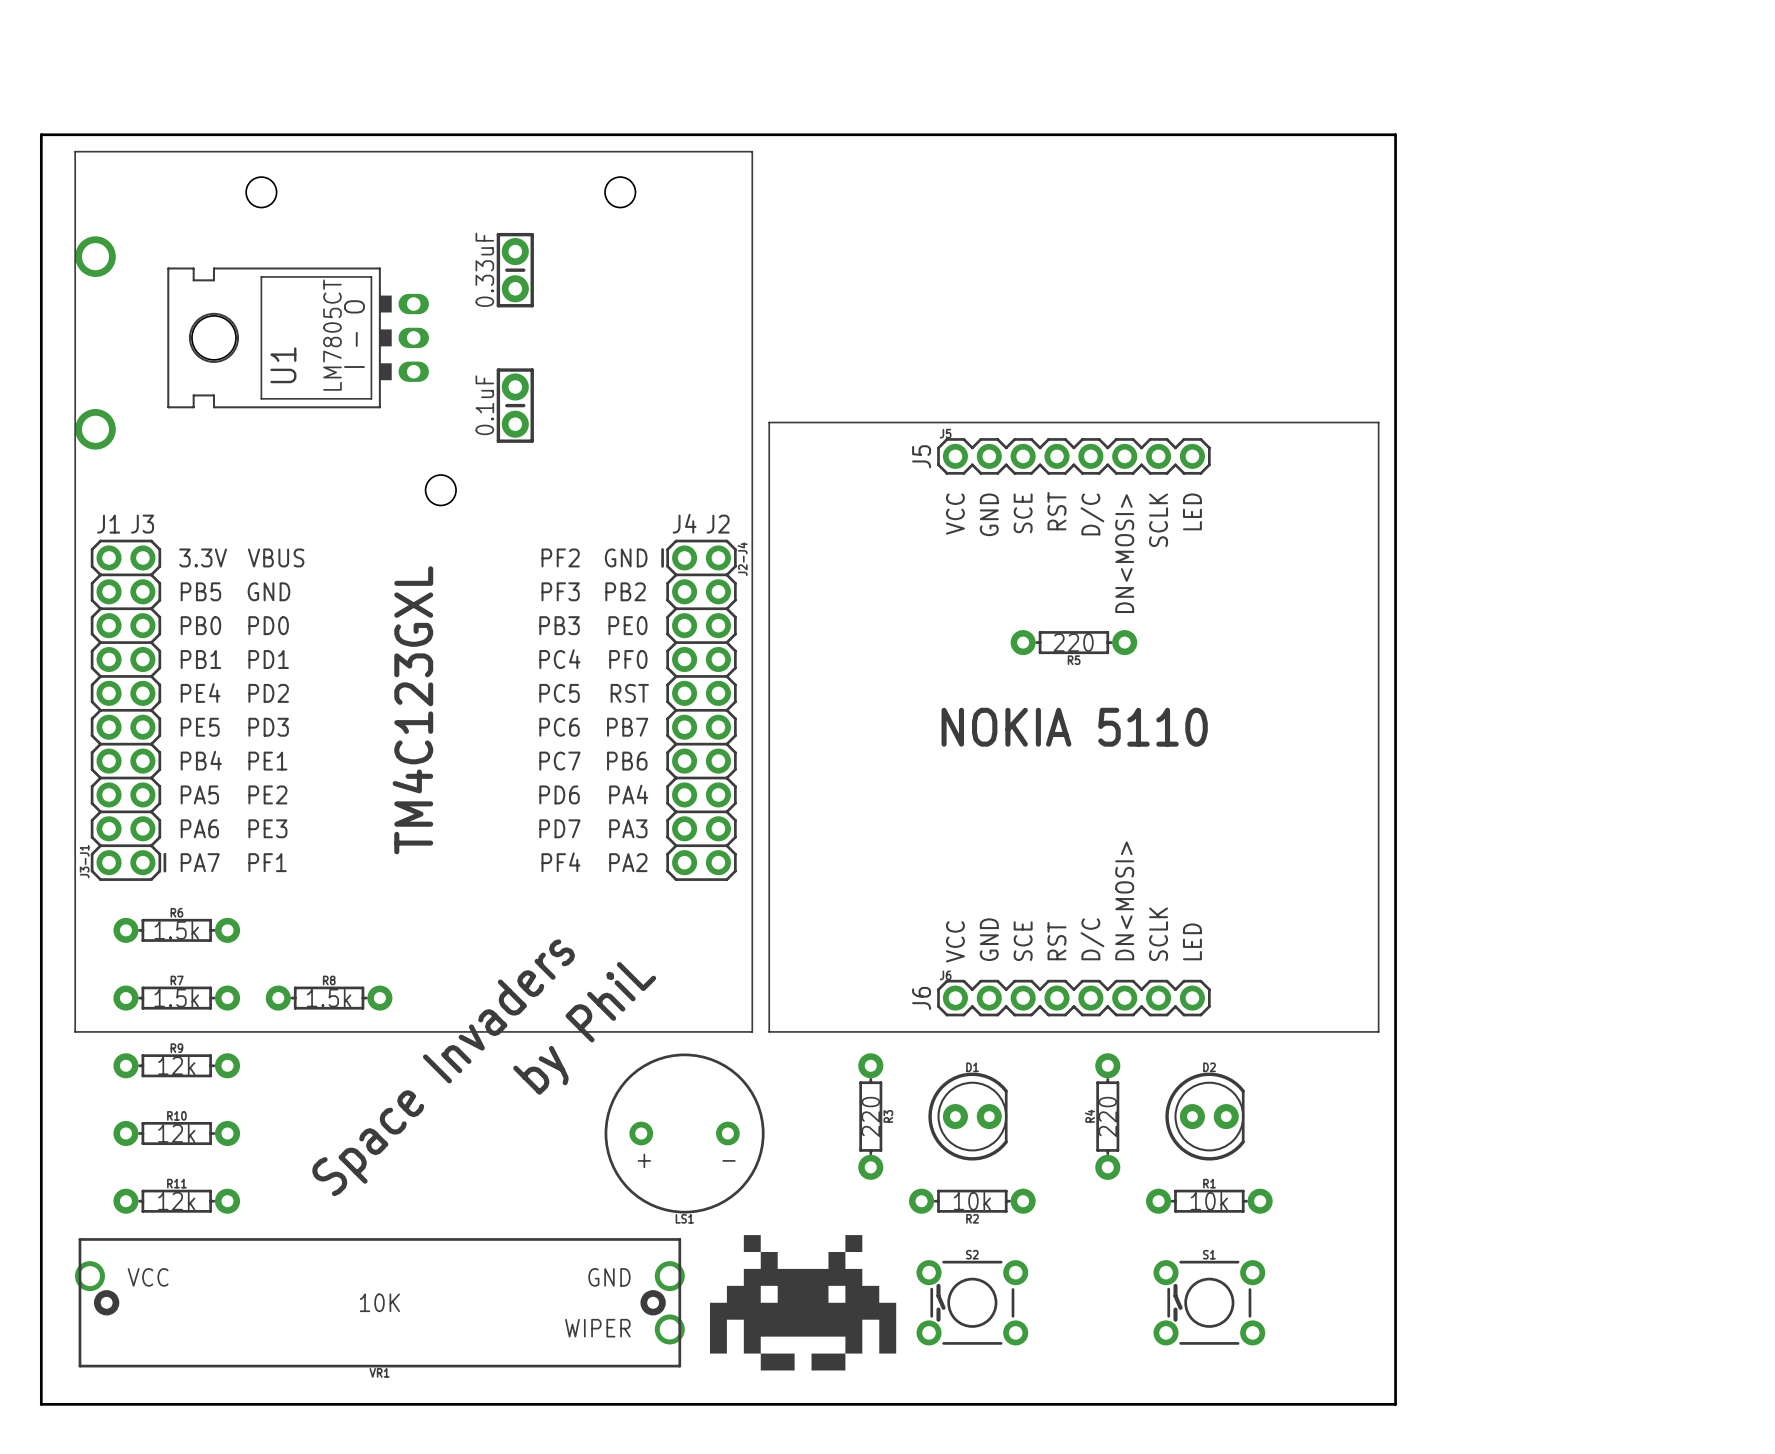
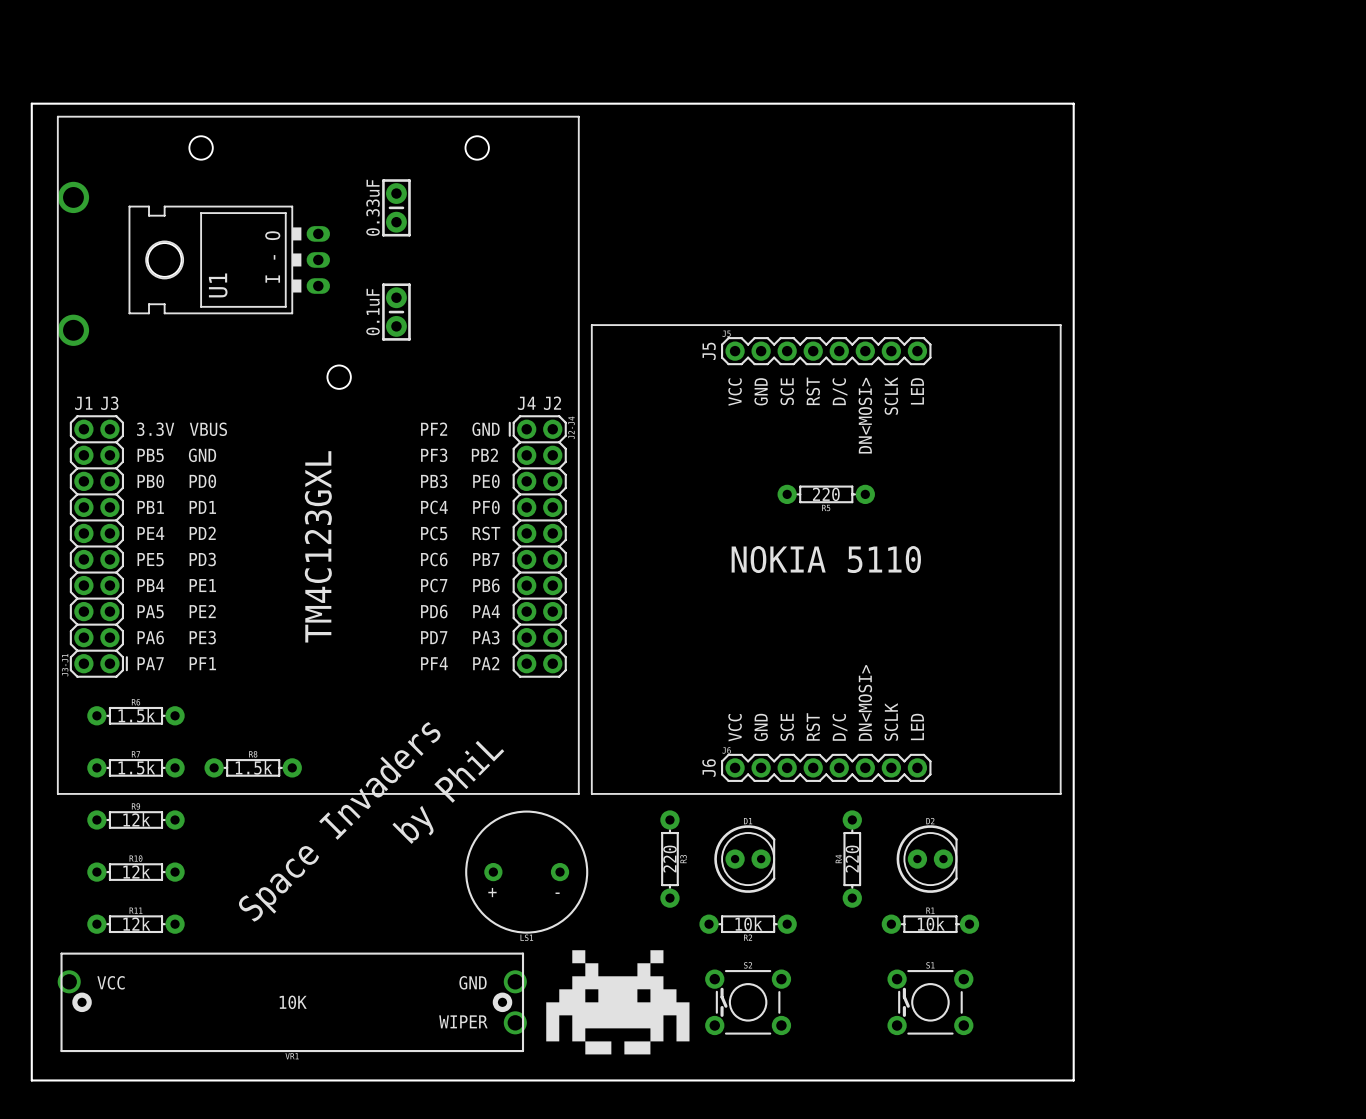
text: LM7805CT (332, 335) -> none

